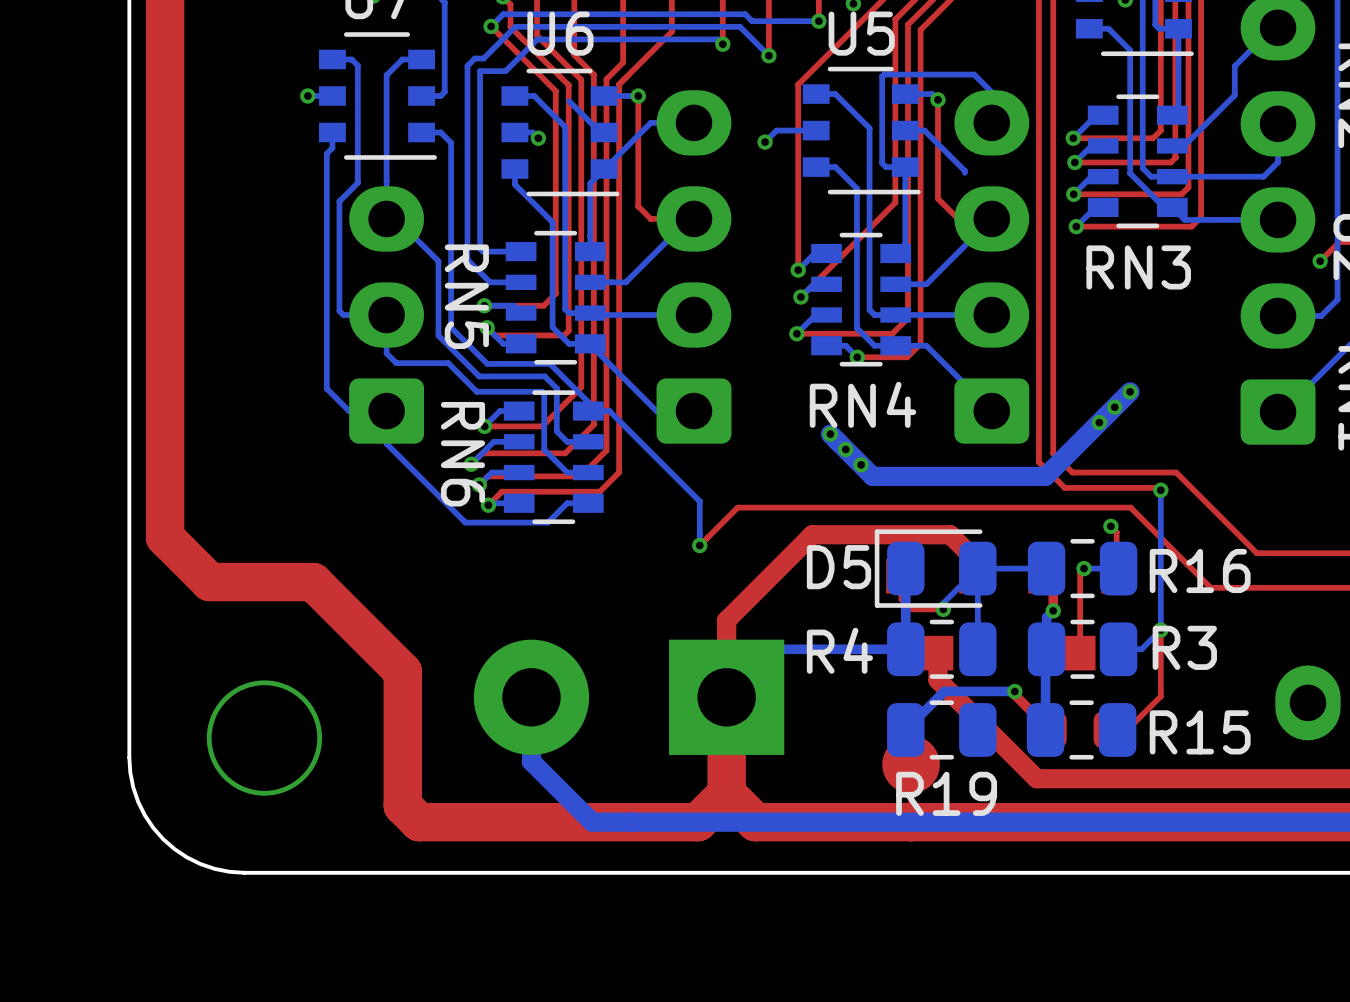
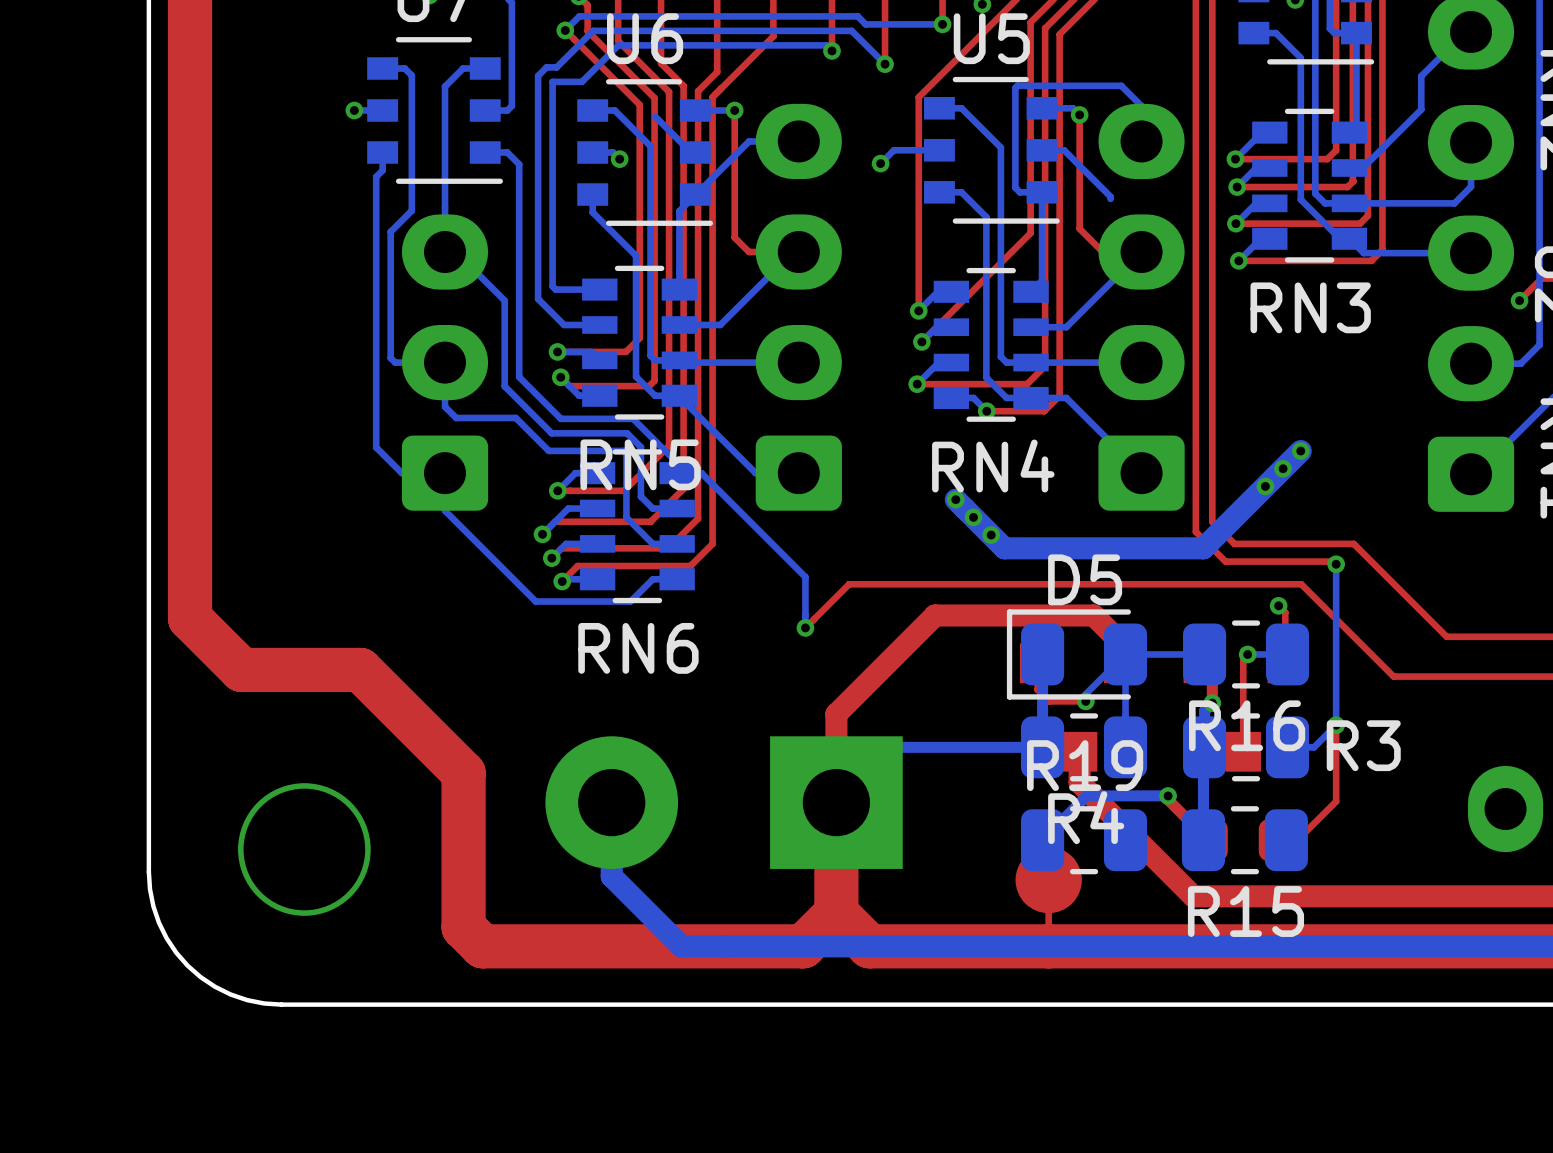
RN5 name rotation: 0° (466, 296) -> 90° counterclockwise (640, 464)
RN5 name position: RN5 (466, 296) -> RN5 (640, 464)
RN6 name rotation: 0° (462, 454) -> 90° counterclockwise (638, 648)
RN6 name position: RN6 (462, 454) -> RN6 (638, 648)
D5 name position: D5 (839, 567) -> D5 (1085, 579)
R16 name position: R16 (1200, 571) -> R16 (1247, 725)
R4 name position: R4 (839, 650) -> R4 (1086, 817)
R15 name position: R15 (1200, 732) -> R15 (1245, 911)
R19 name position: R19 (946, 793) -> R19 (1085, 765)

